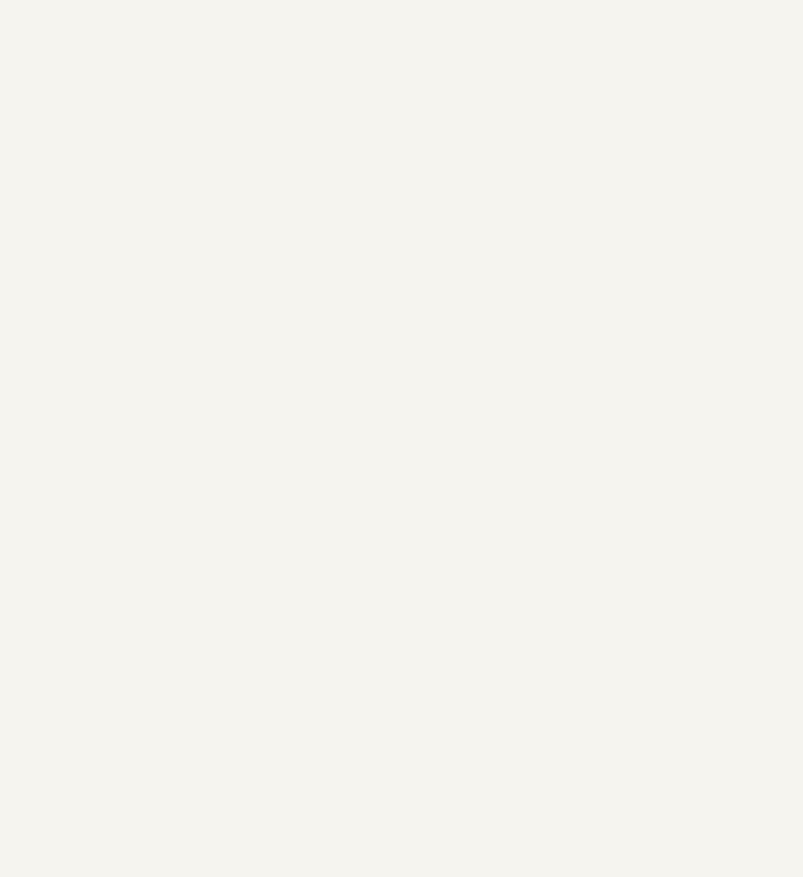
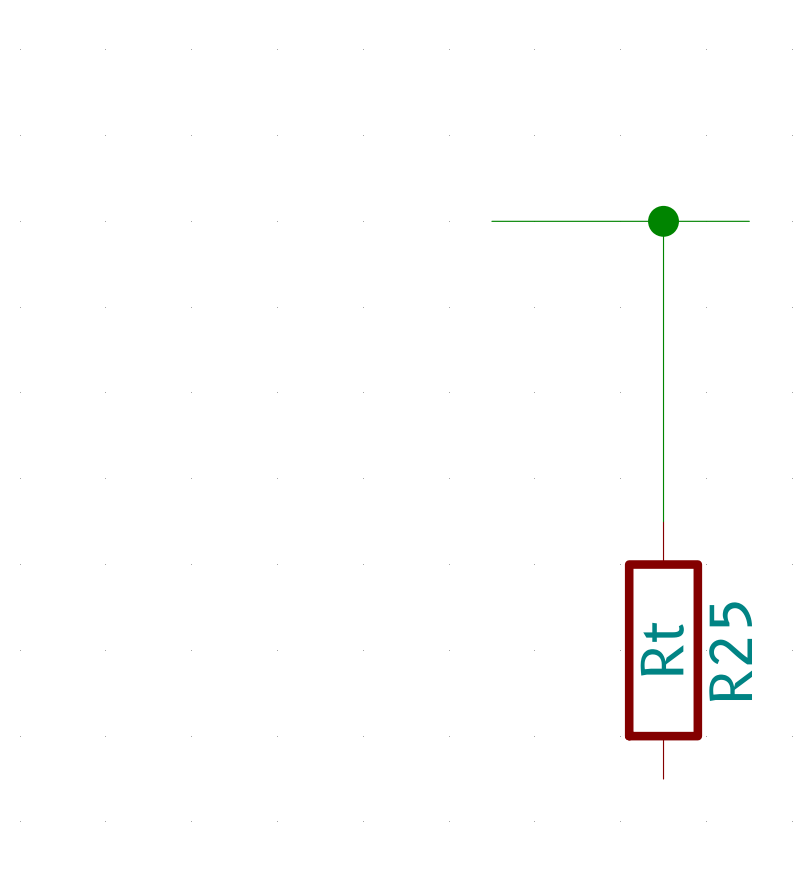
wire: none -> (491, 221) (749, 221)
wire: none -> (663, 221) (663, 521)
junction: none -> (663, 221)
R25: none -> Rt (663, 650)

